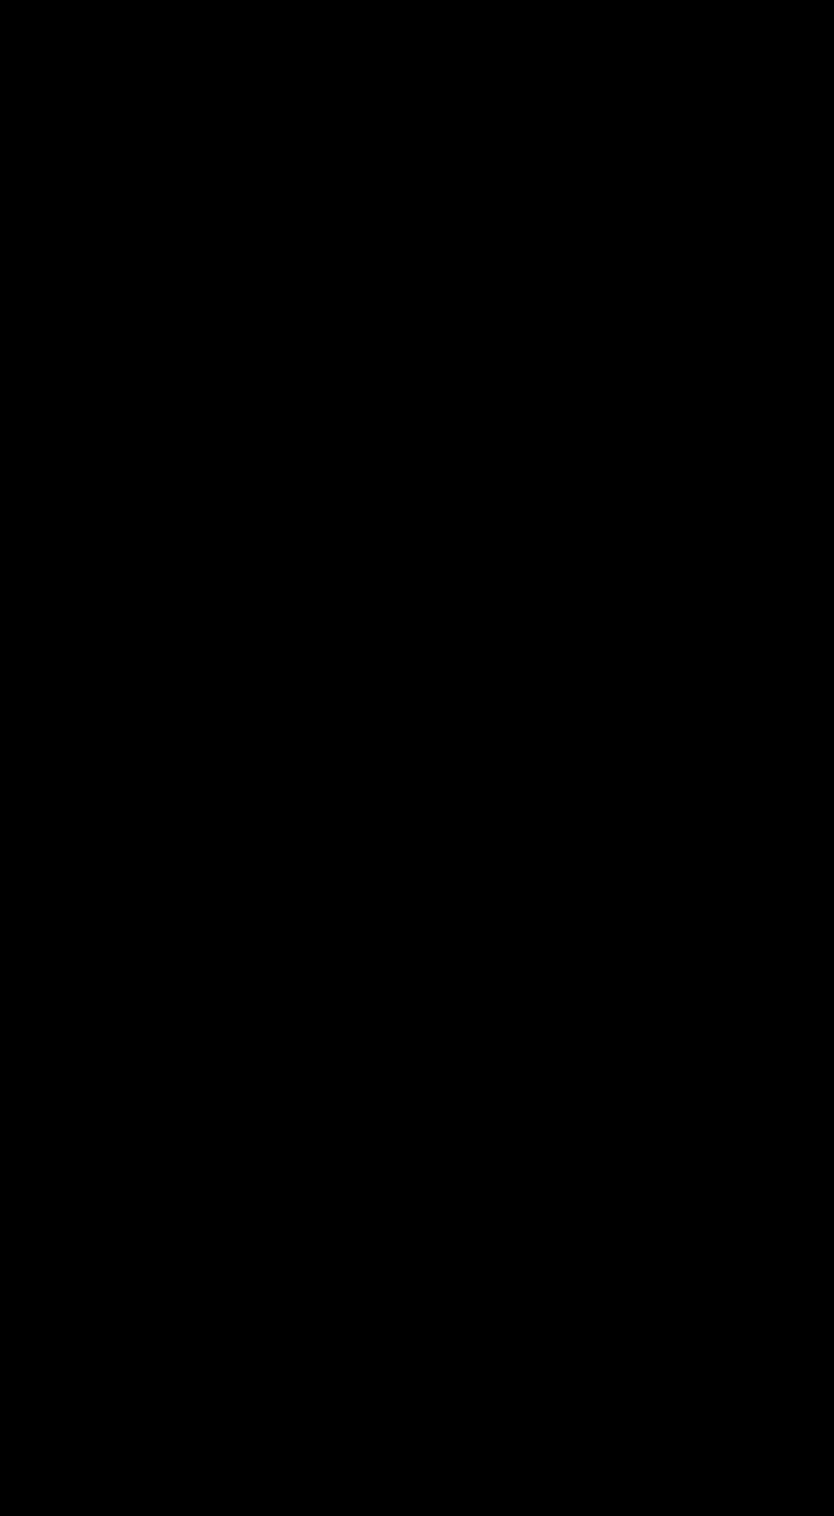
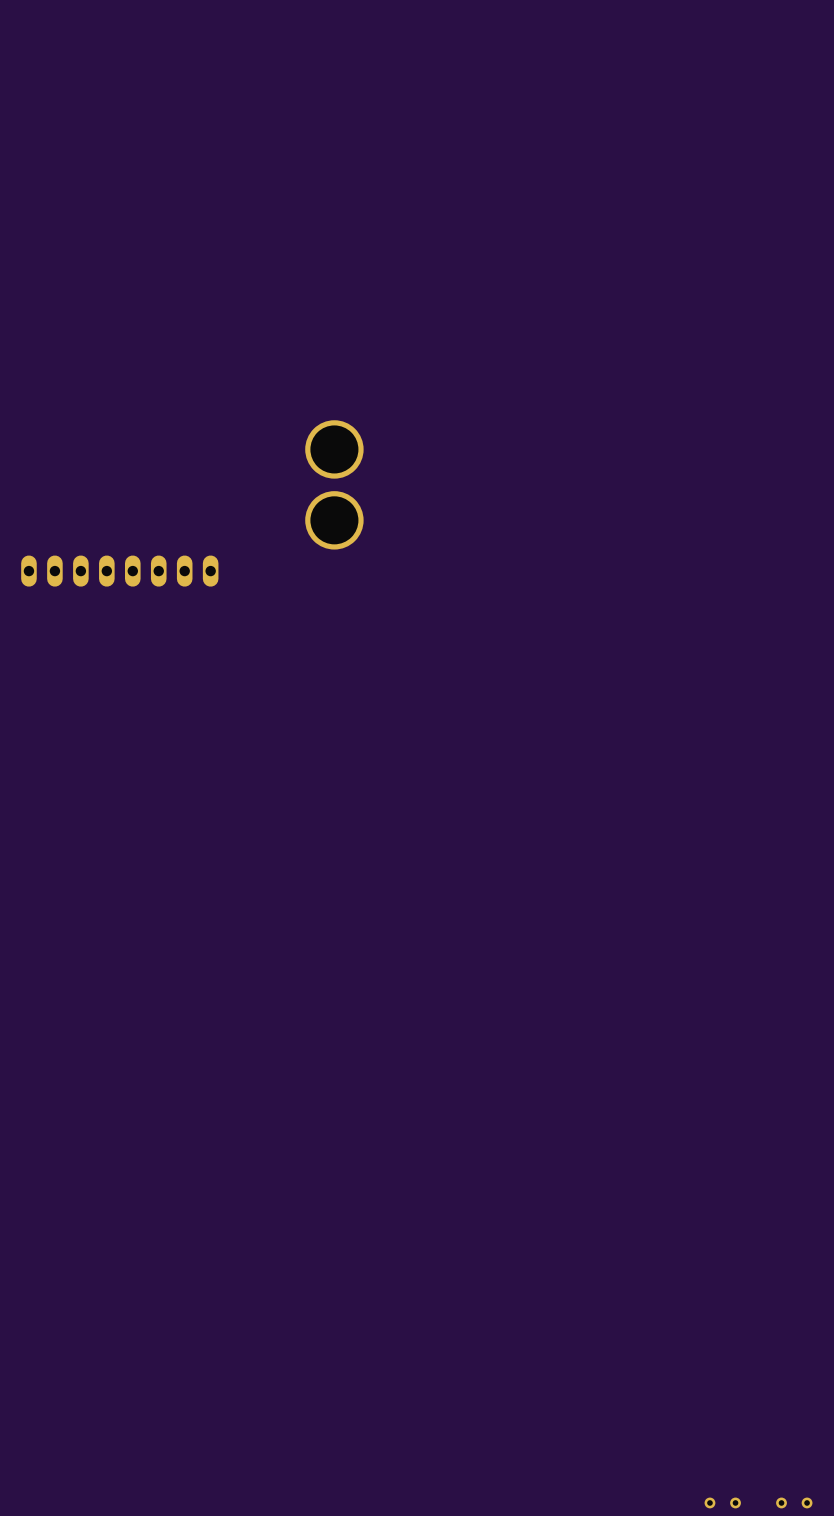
part: none -> (334, 484)
part: none -> (119, 571)
part: none -> (722, 1502)
part: none -> (794, 1502)

